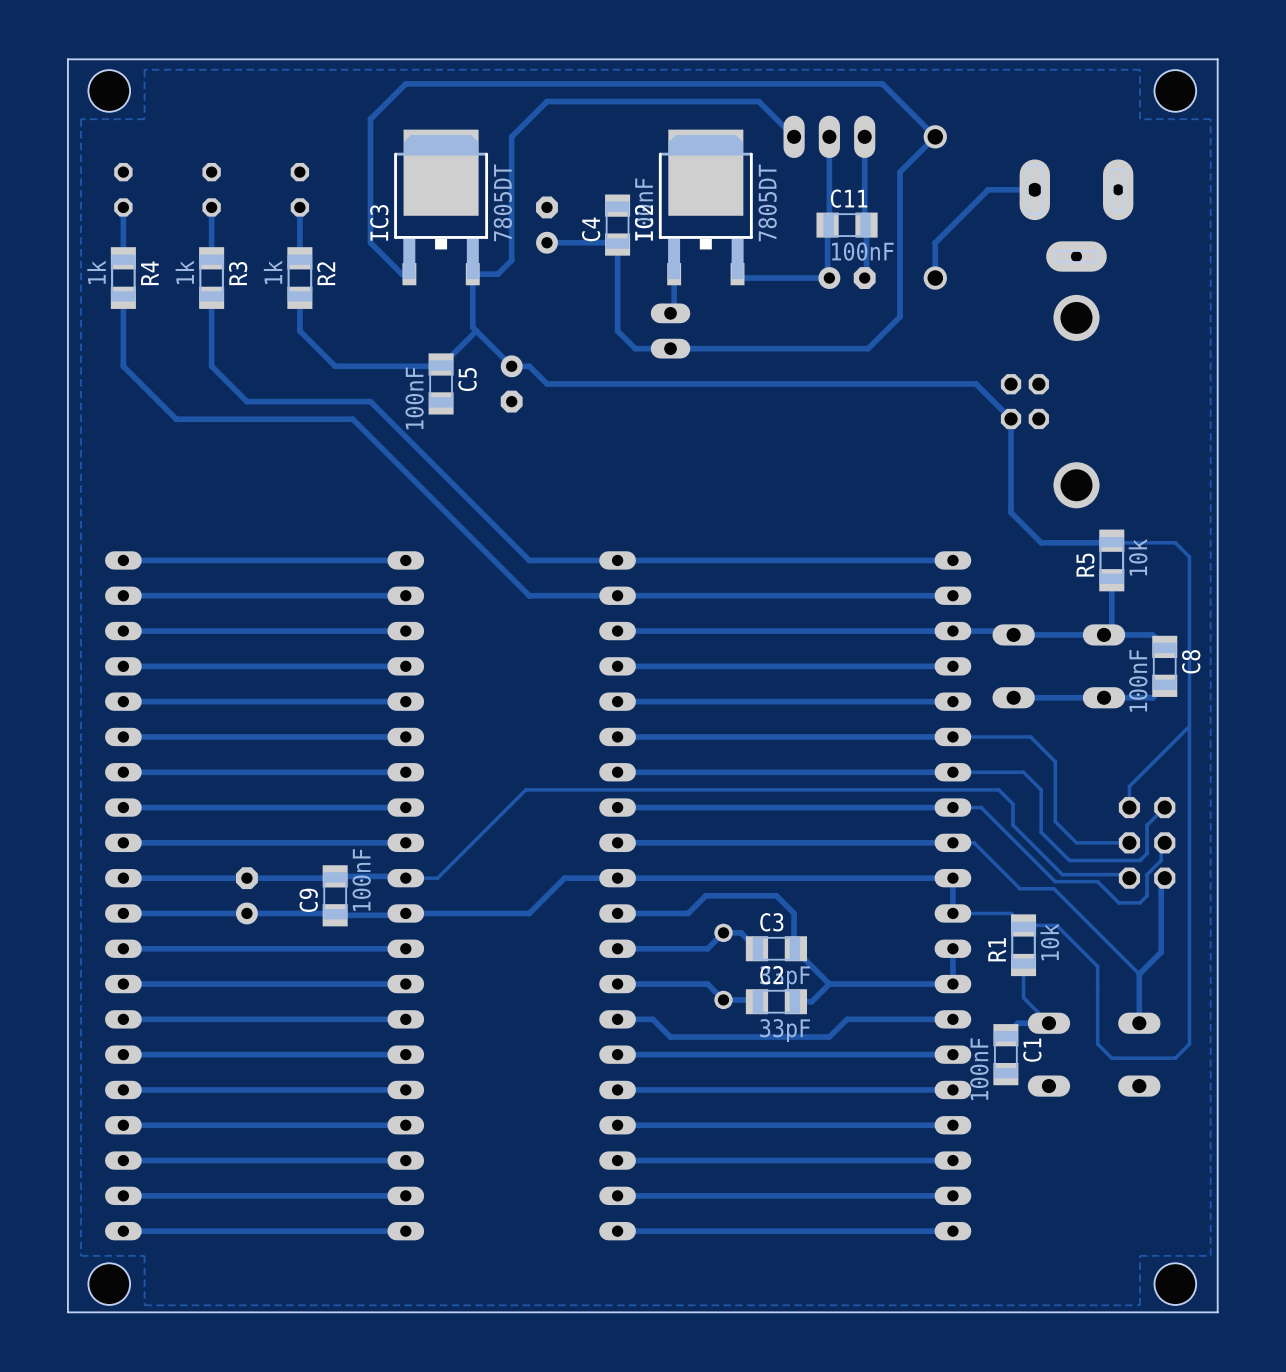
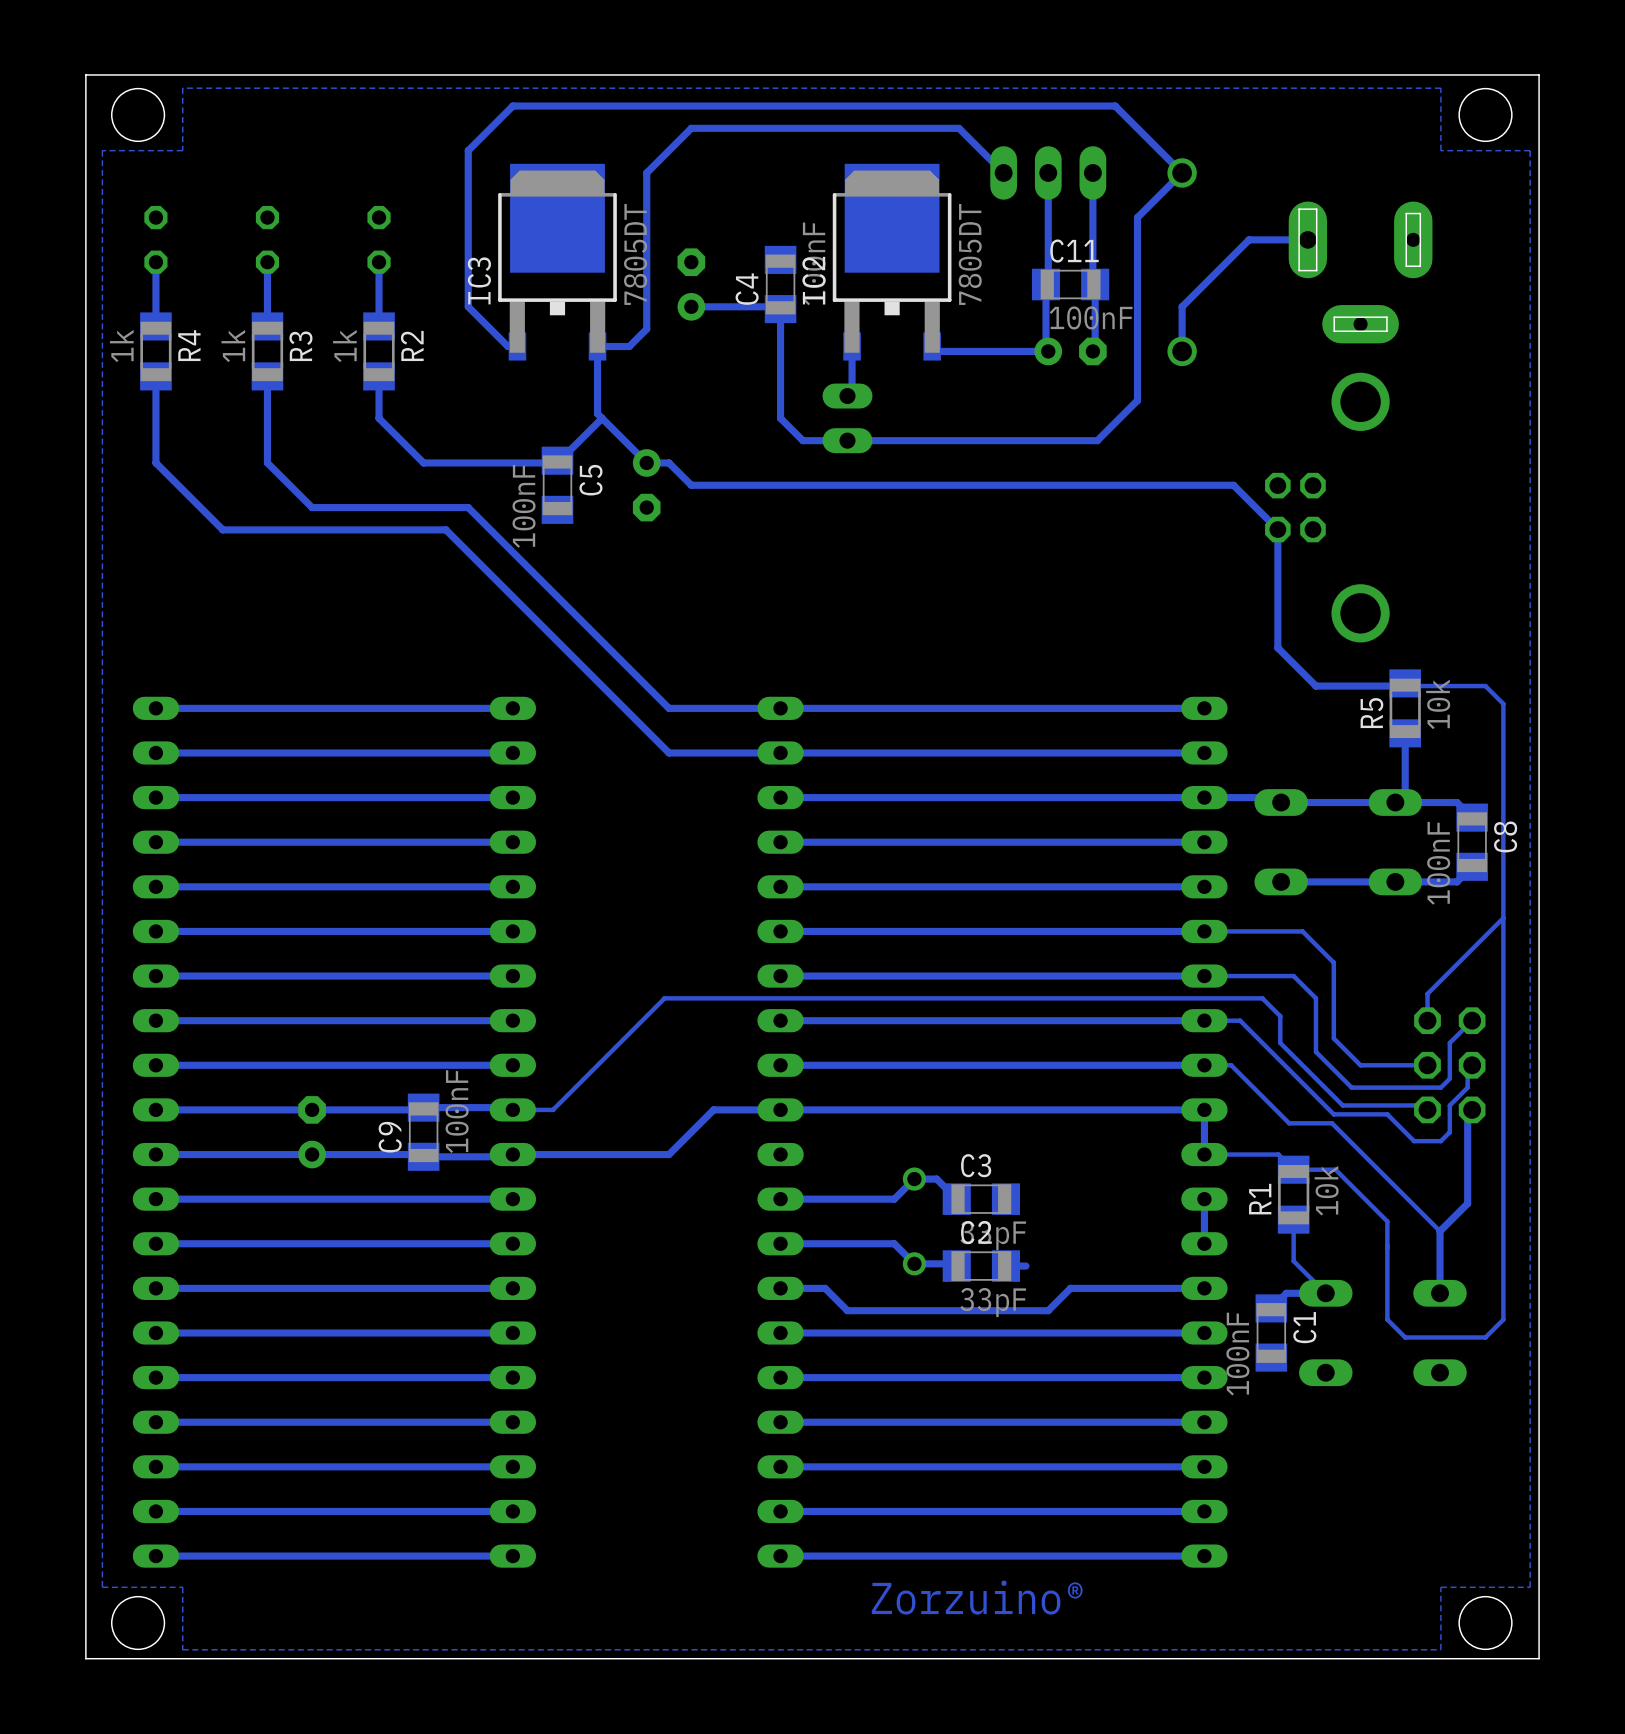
track: (617, 913) (688, 913) (705, 895) (776, 895) (794, 913) (794, 946) -> none
track: (795, 950) (829, 984) -> none
track: (829, 984) (811, 1001) -> none
track: (952, 984) (829, 984) -> none
text: none -> Zorzuino® (977, 1597)

